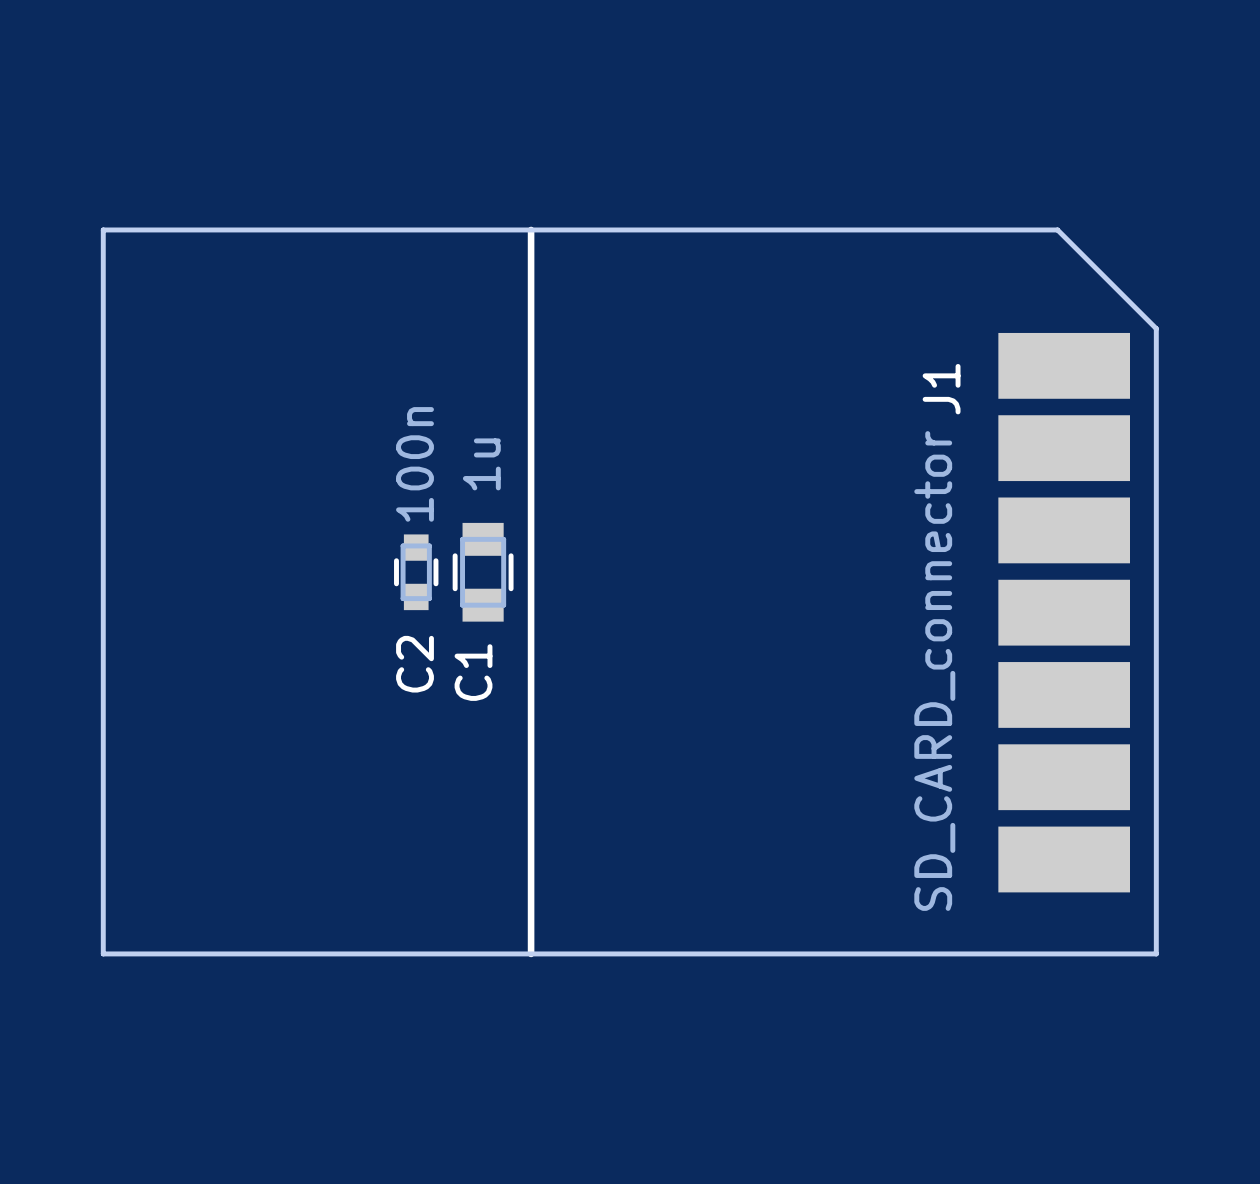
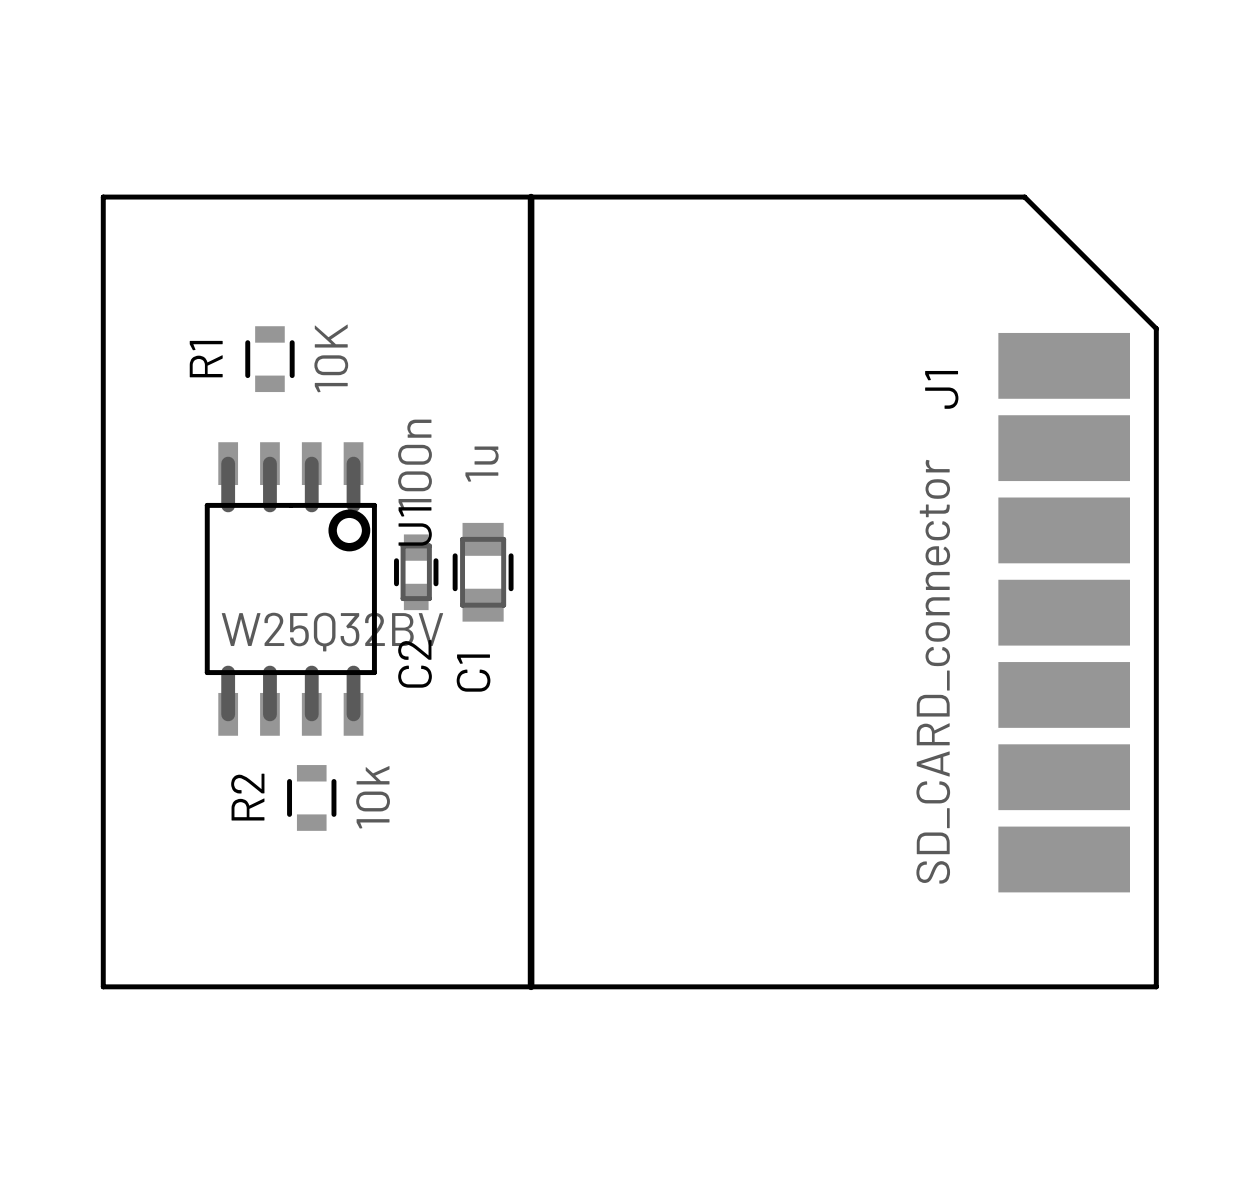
line: none -> (531, 197) (531, 229)
board edge: (103, 229) (1057, 229) -> (103, 229) (103, 197) (1024, 197) (1057, 229)
R1: none -> 10K (269, 359)
U1: none -> W25Q32BV (290, 588)
R2: none -> 10k (311, 797)
board edge: (103, 953) (1156, 953) -> (103, 953) (103, 986) (1156, 986) (1156, 953)
line: none -> (531, 953) (531, 986)

